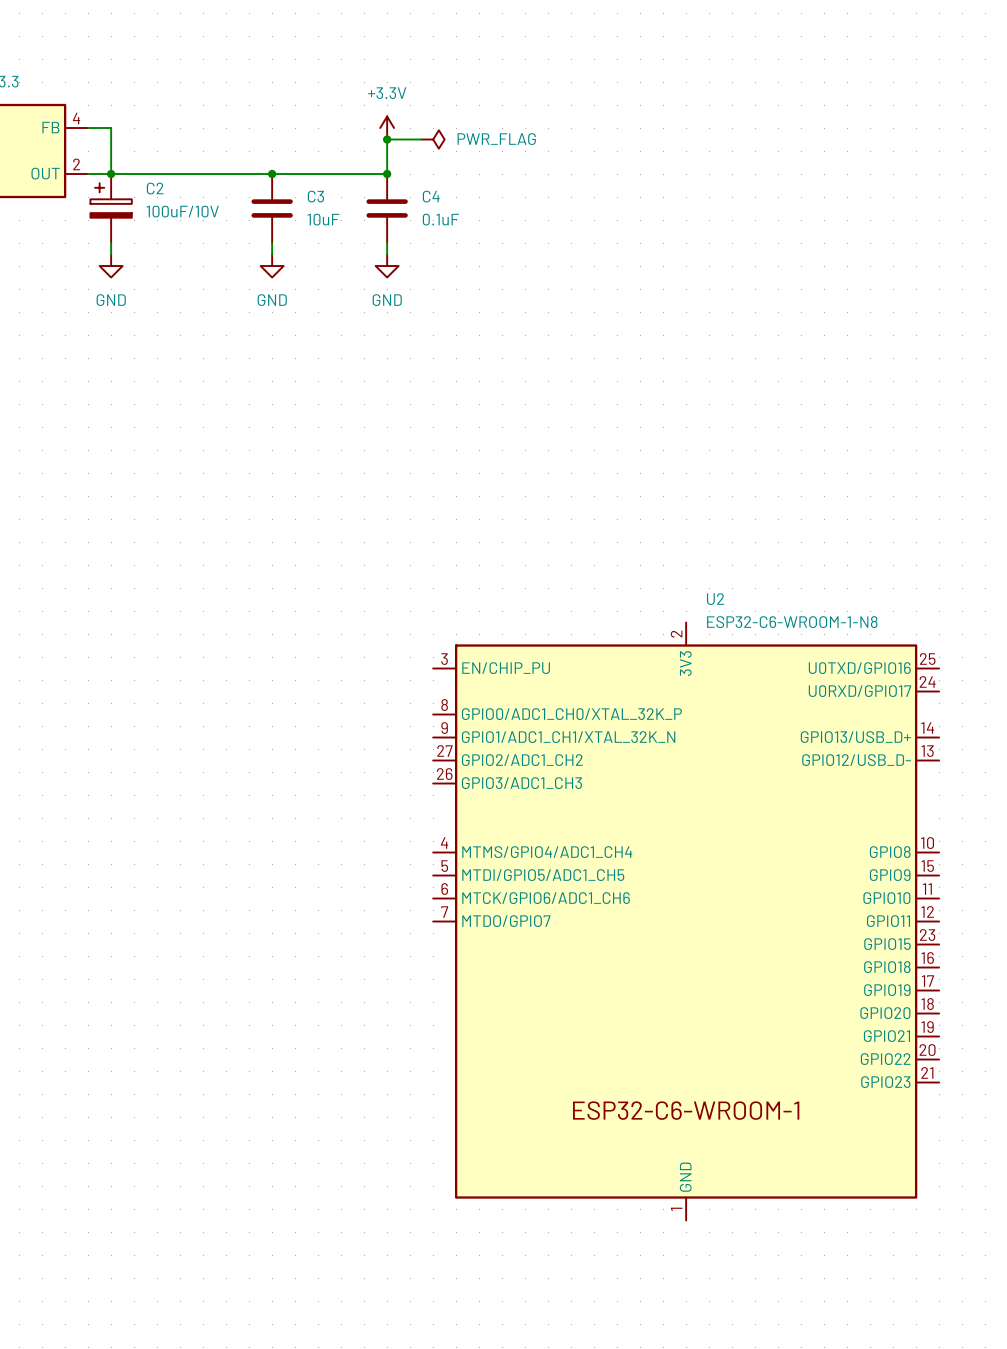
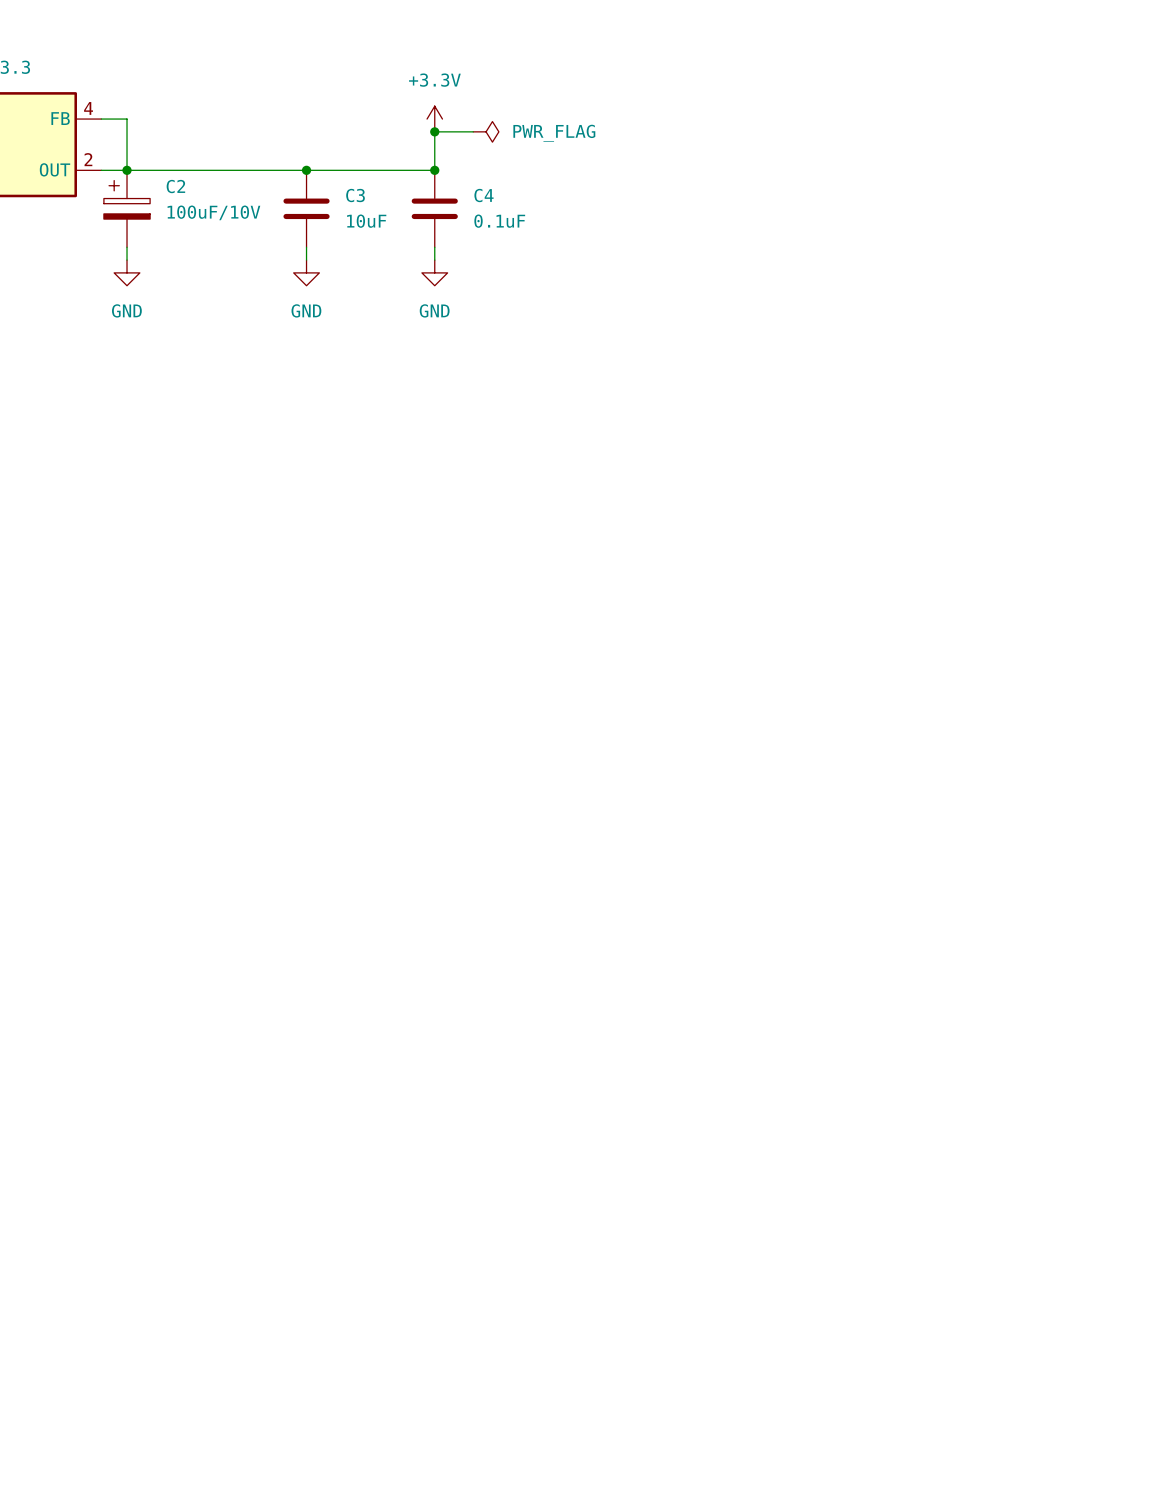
U2: ESP32-C6-WROOM-1-N8 (686, 921) -> none

